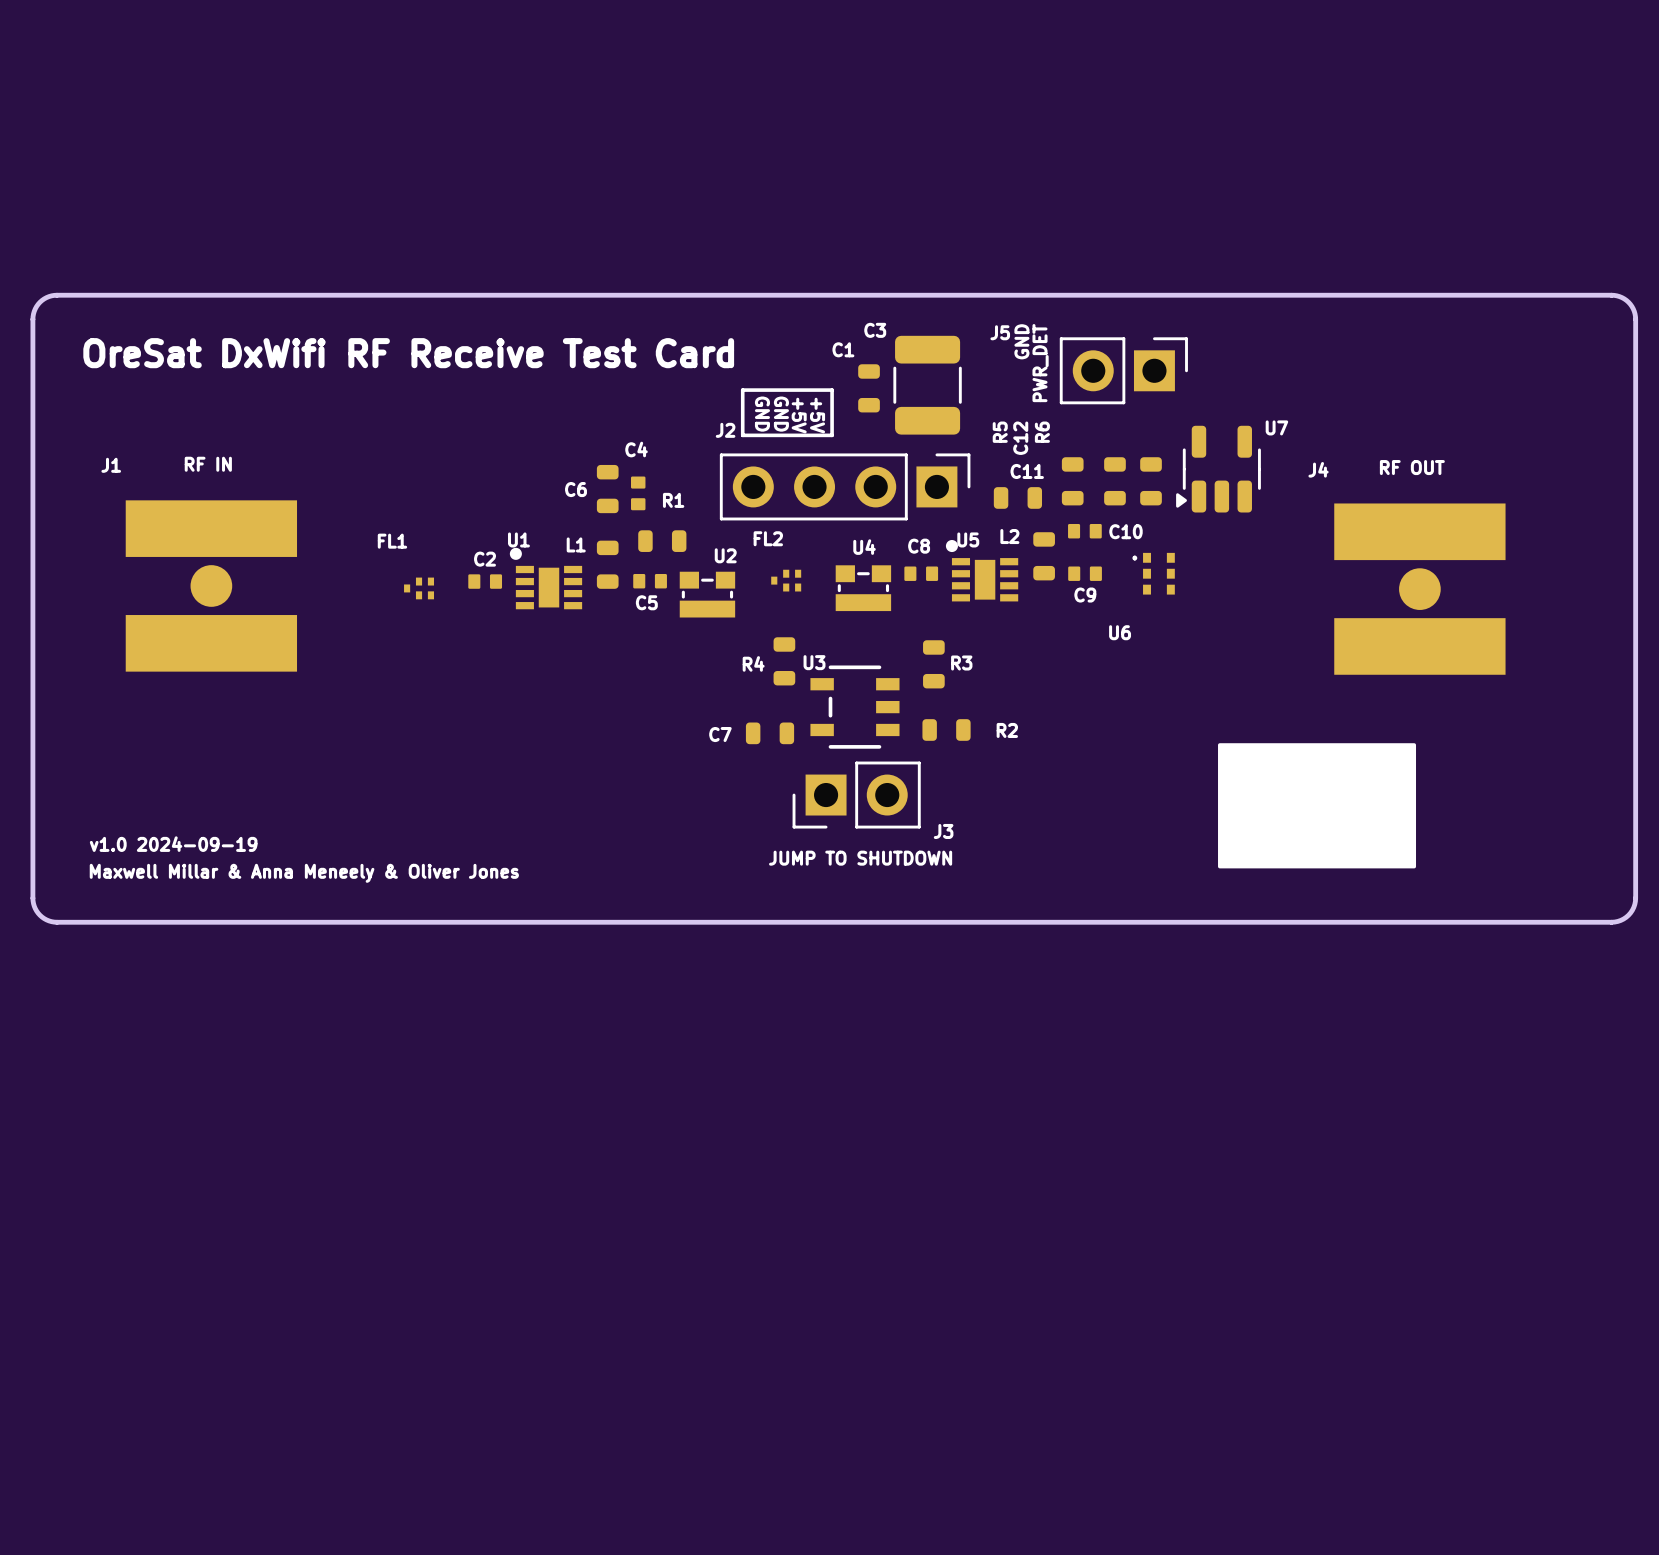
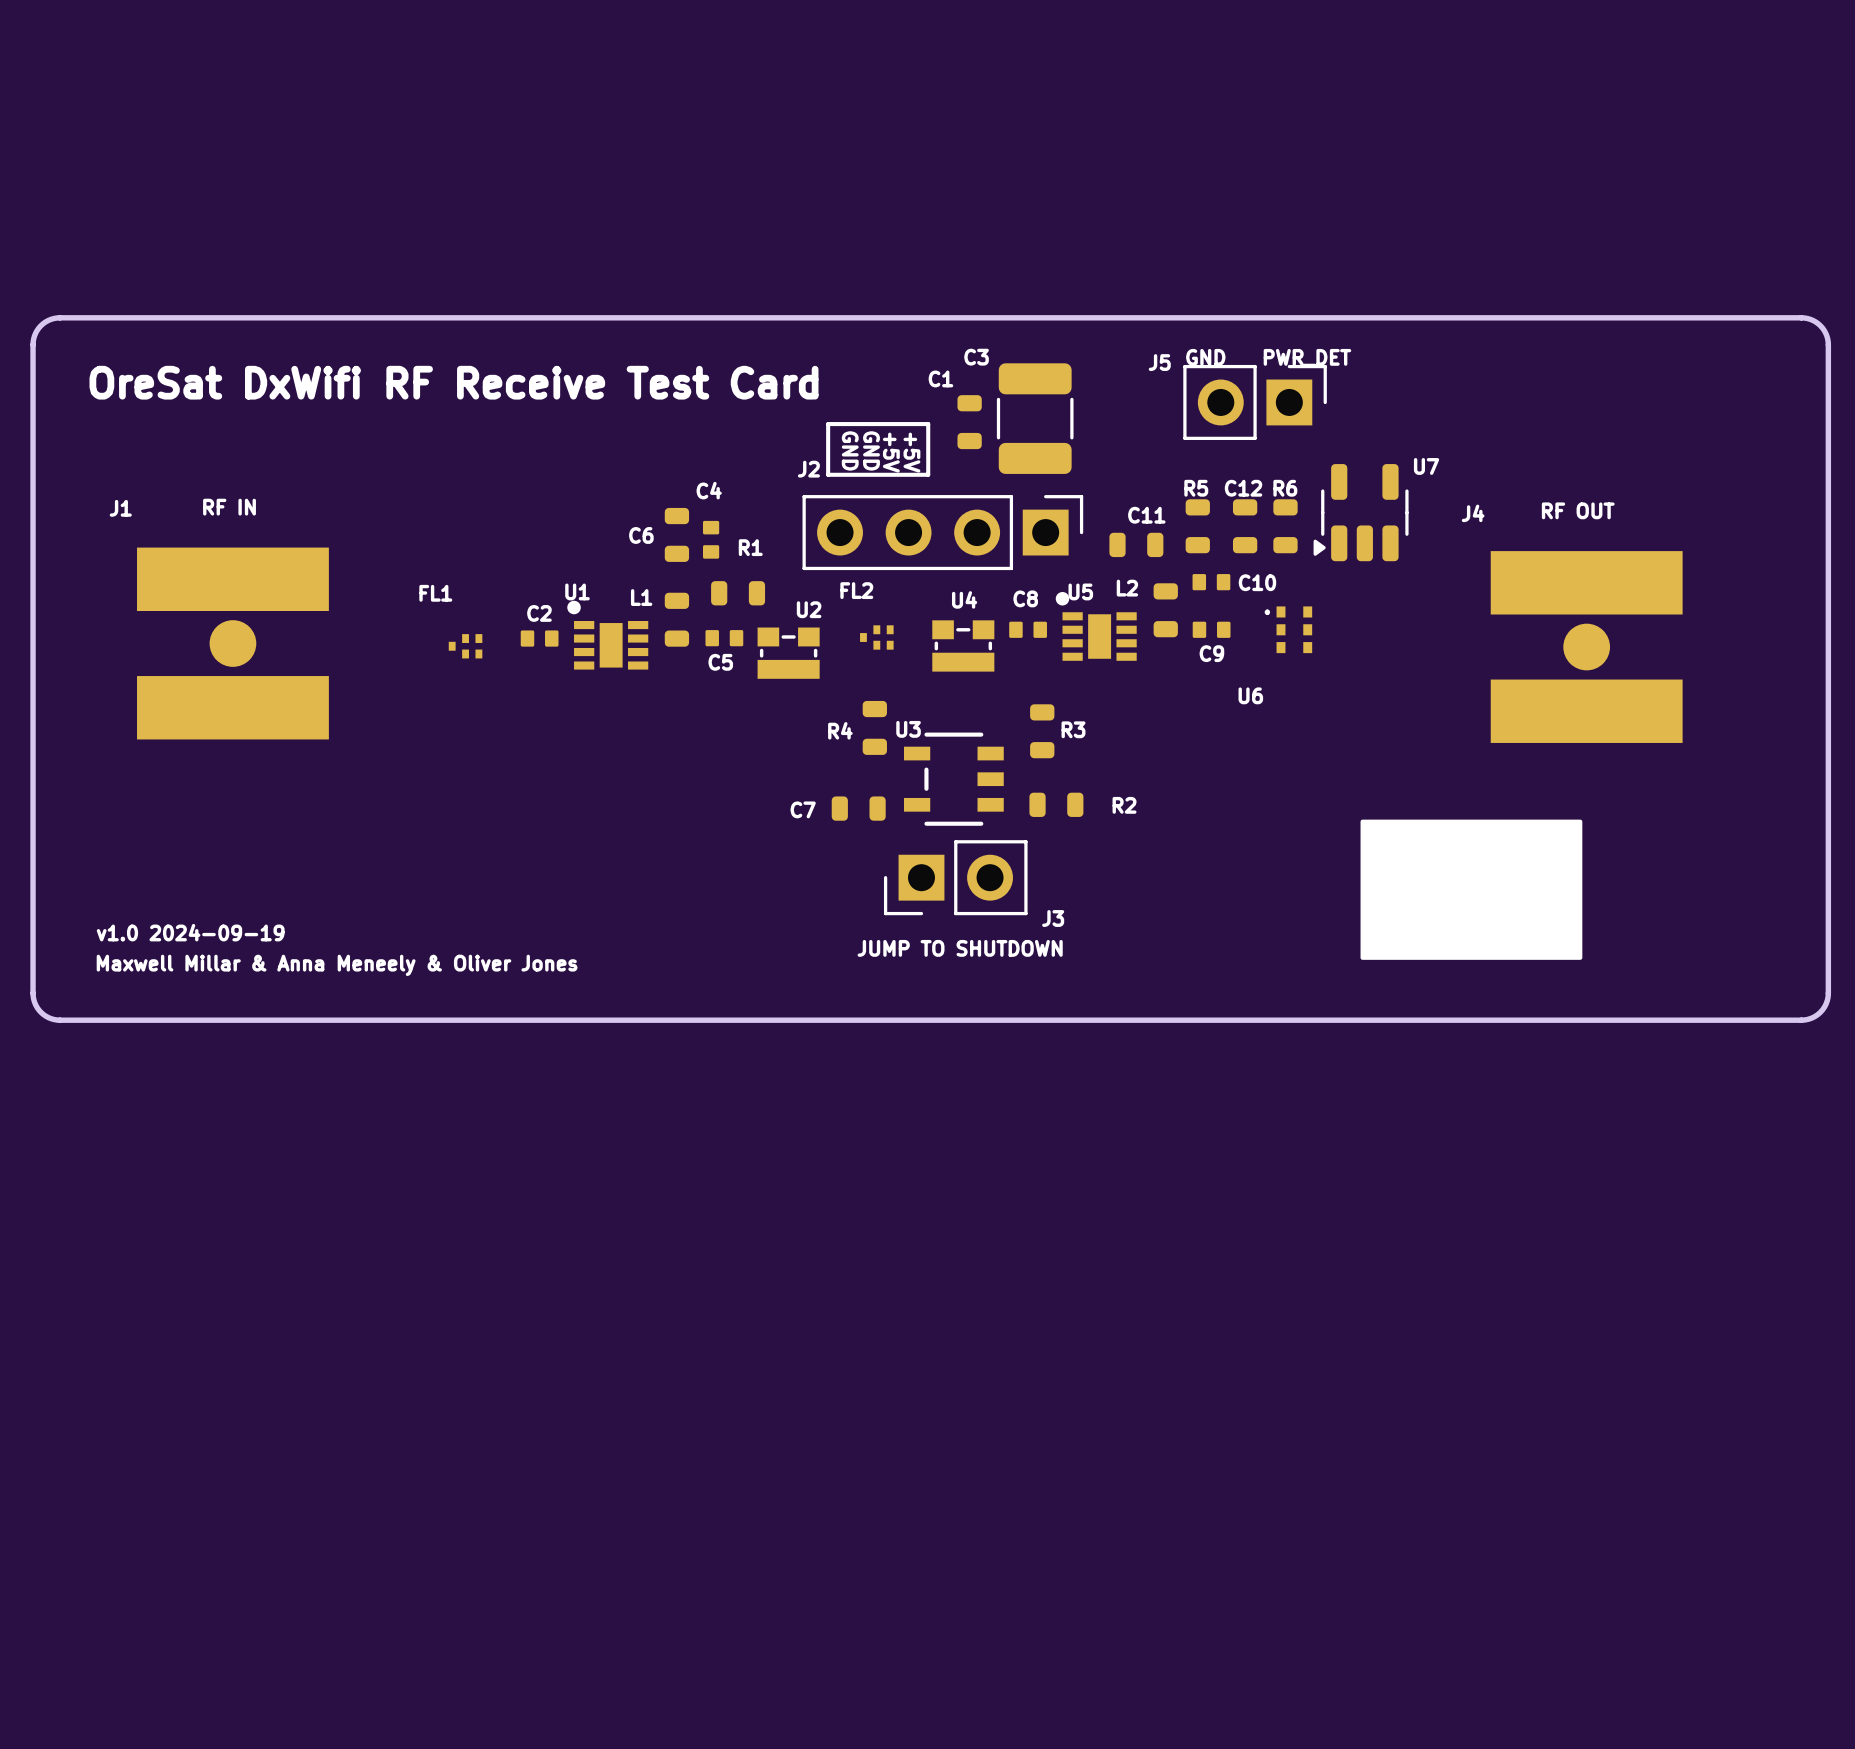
J5 name position: J5 (1000, 332) -> J5 (1159, 362)
text rotation: 0° (1021, 341) -> 90° clockwise (1205, 357)
text position: GND (1021, 341) -> GND (1205, 357)
text rotation: 0° (1040, 363) -> 90° clockwise (1307, 358)
text position: PWR_DET (1040, 363) -> PWR_DET (1307, 358)
R5 name rotation: 0° (1000, 432) -> 90° clockwise (1196, 488)
R5 name position: R5 (1000, 432) -> R5 (1196, 488)
R6 name rotation: 0° (1042, 432) -> 90° clockwise (1285, 488)
R6 name position: R6 (1042, 432) -> R6 (1285, 488)
C12 name rotation: 0° (1020, 438) -> 90° clockwise (1243, 488)
C12 name position: C12 (1020, 438) -> C12 (1243, 488)

